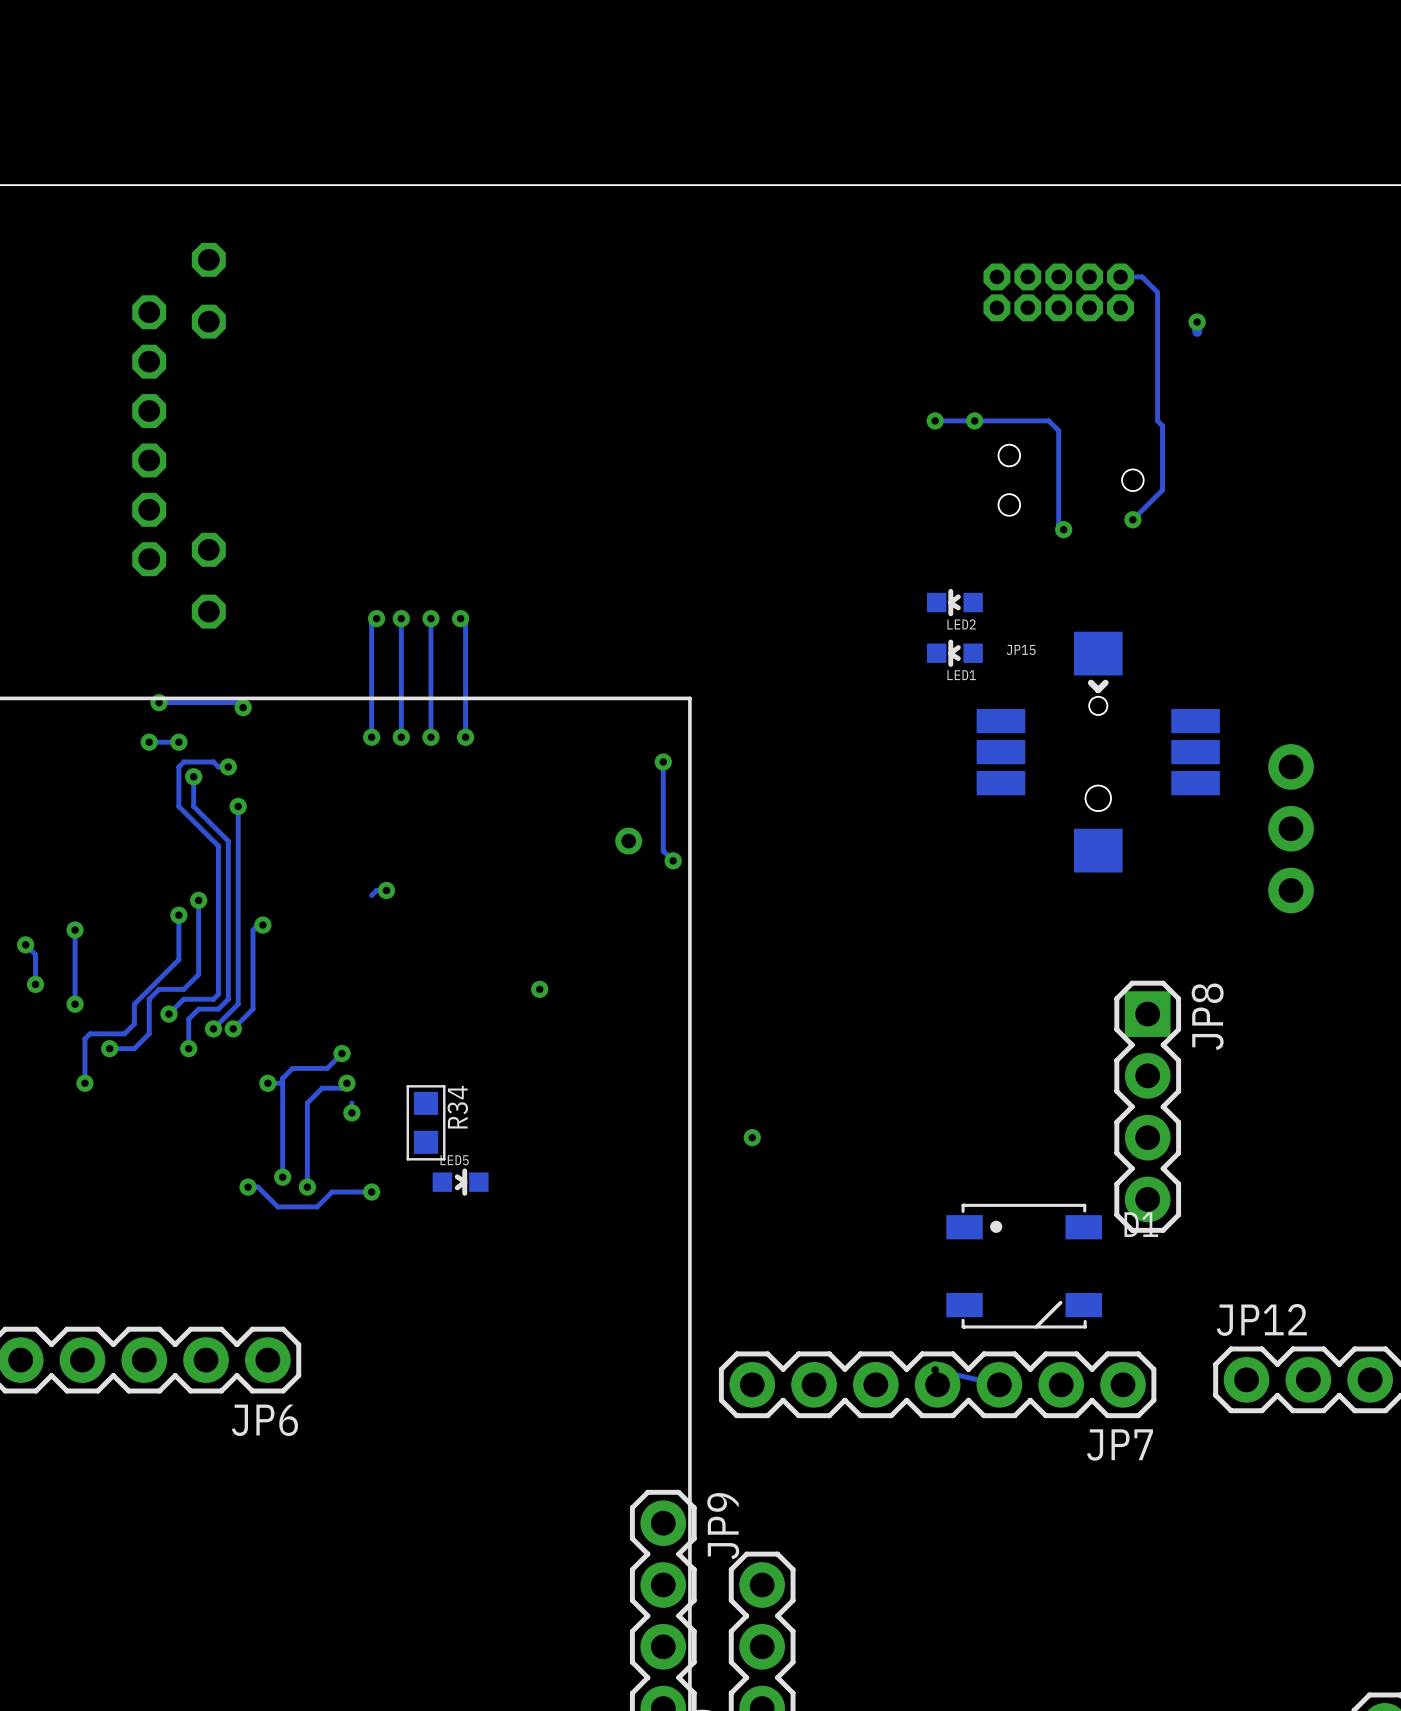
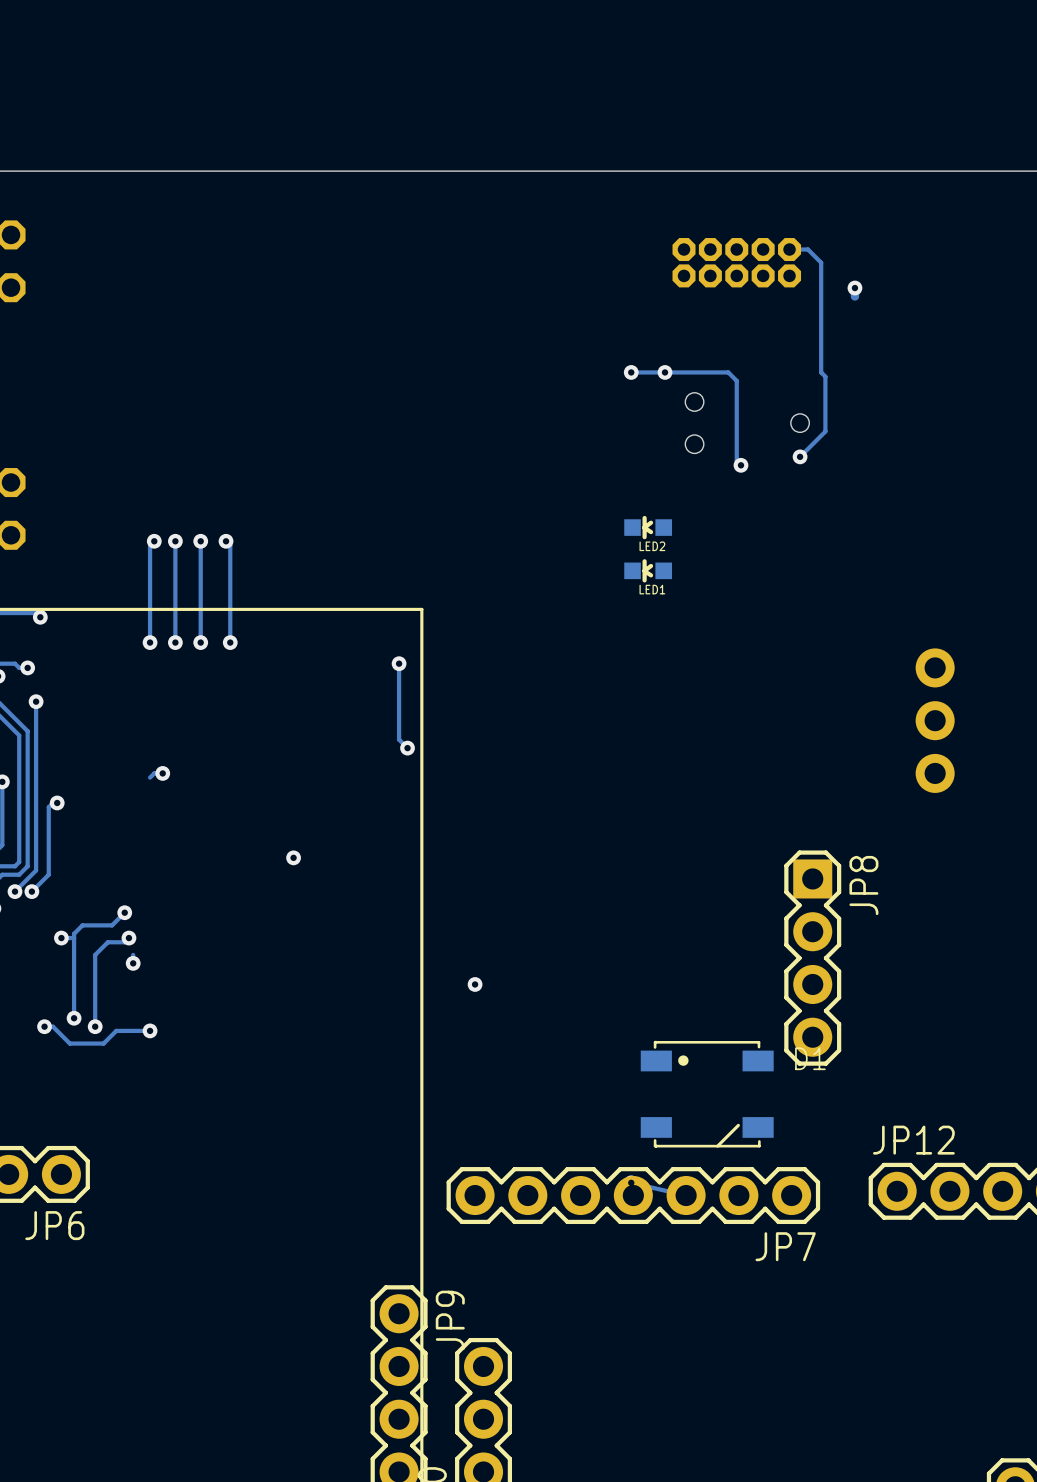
JP15: (1098, 752) -> none
part: (628, 841) -> none
R34: (426, 1122) -> none
LED5: (460, 1182) -> none

